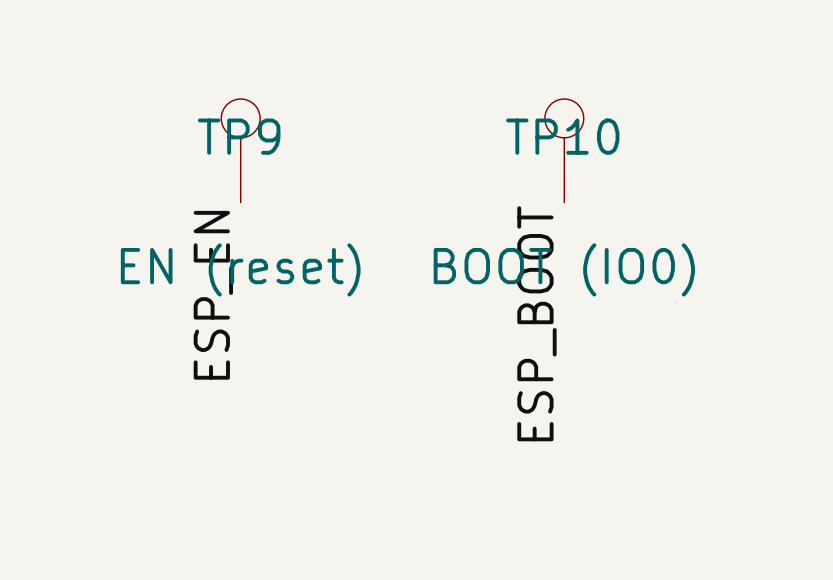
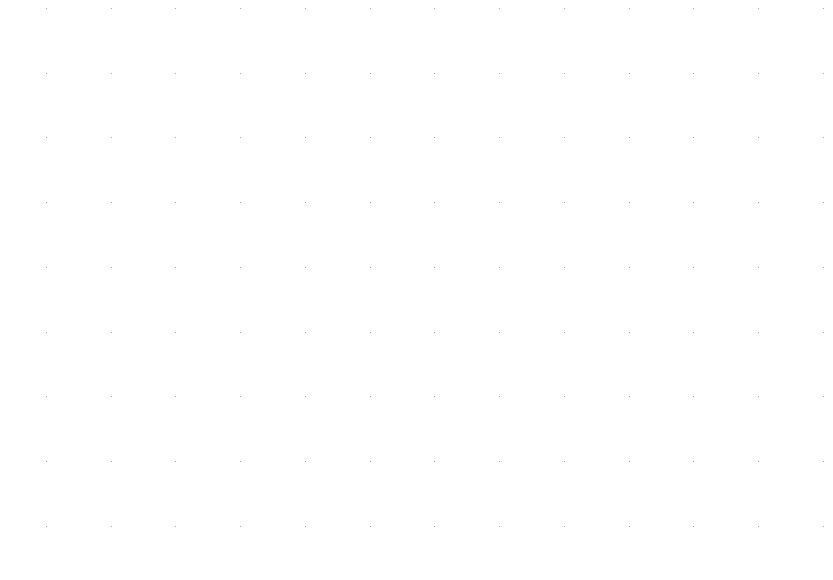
TP9: EN (reset) (240, 150) -> none
TP10: BOOT (IO0) (564, 150) -> none
label: ESP_EN (213, 295) -> none
label: ESP_BOOT (536, 323) -> none

